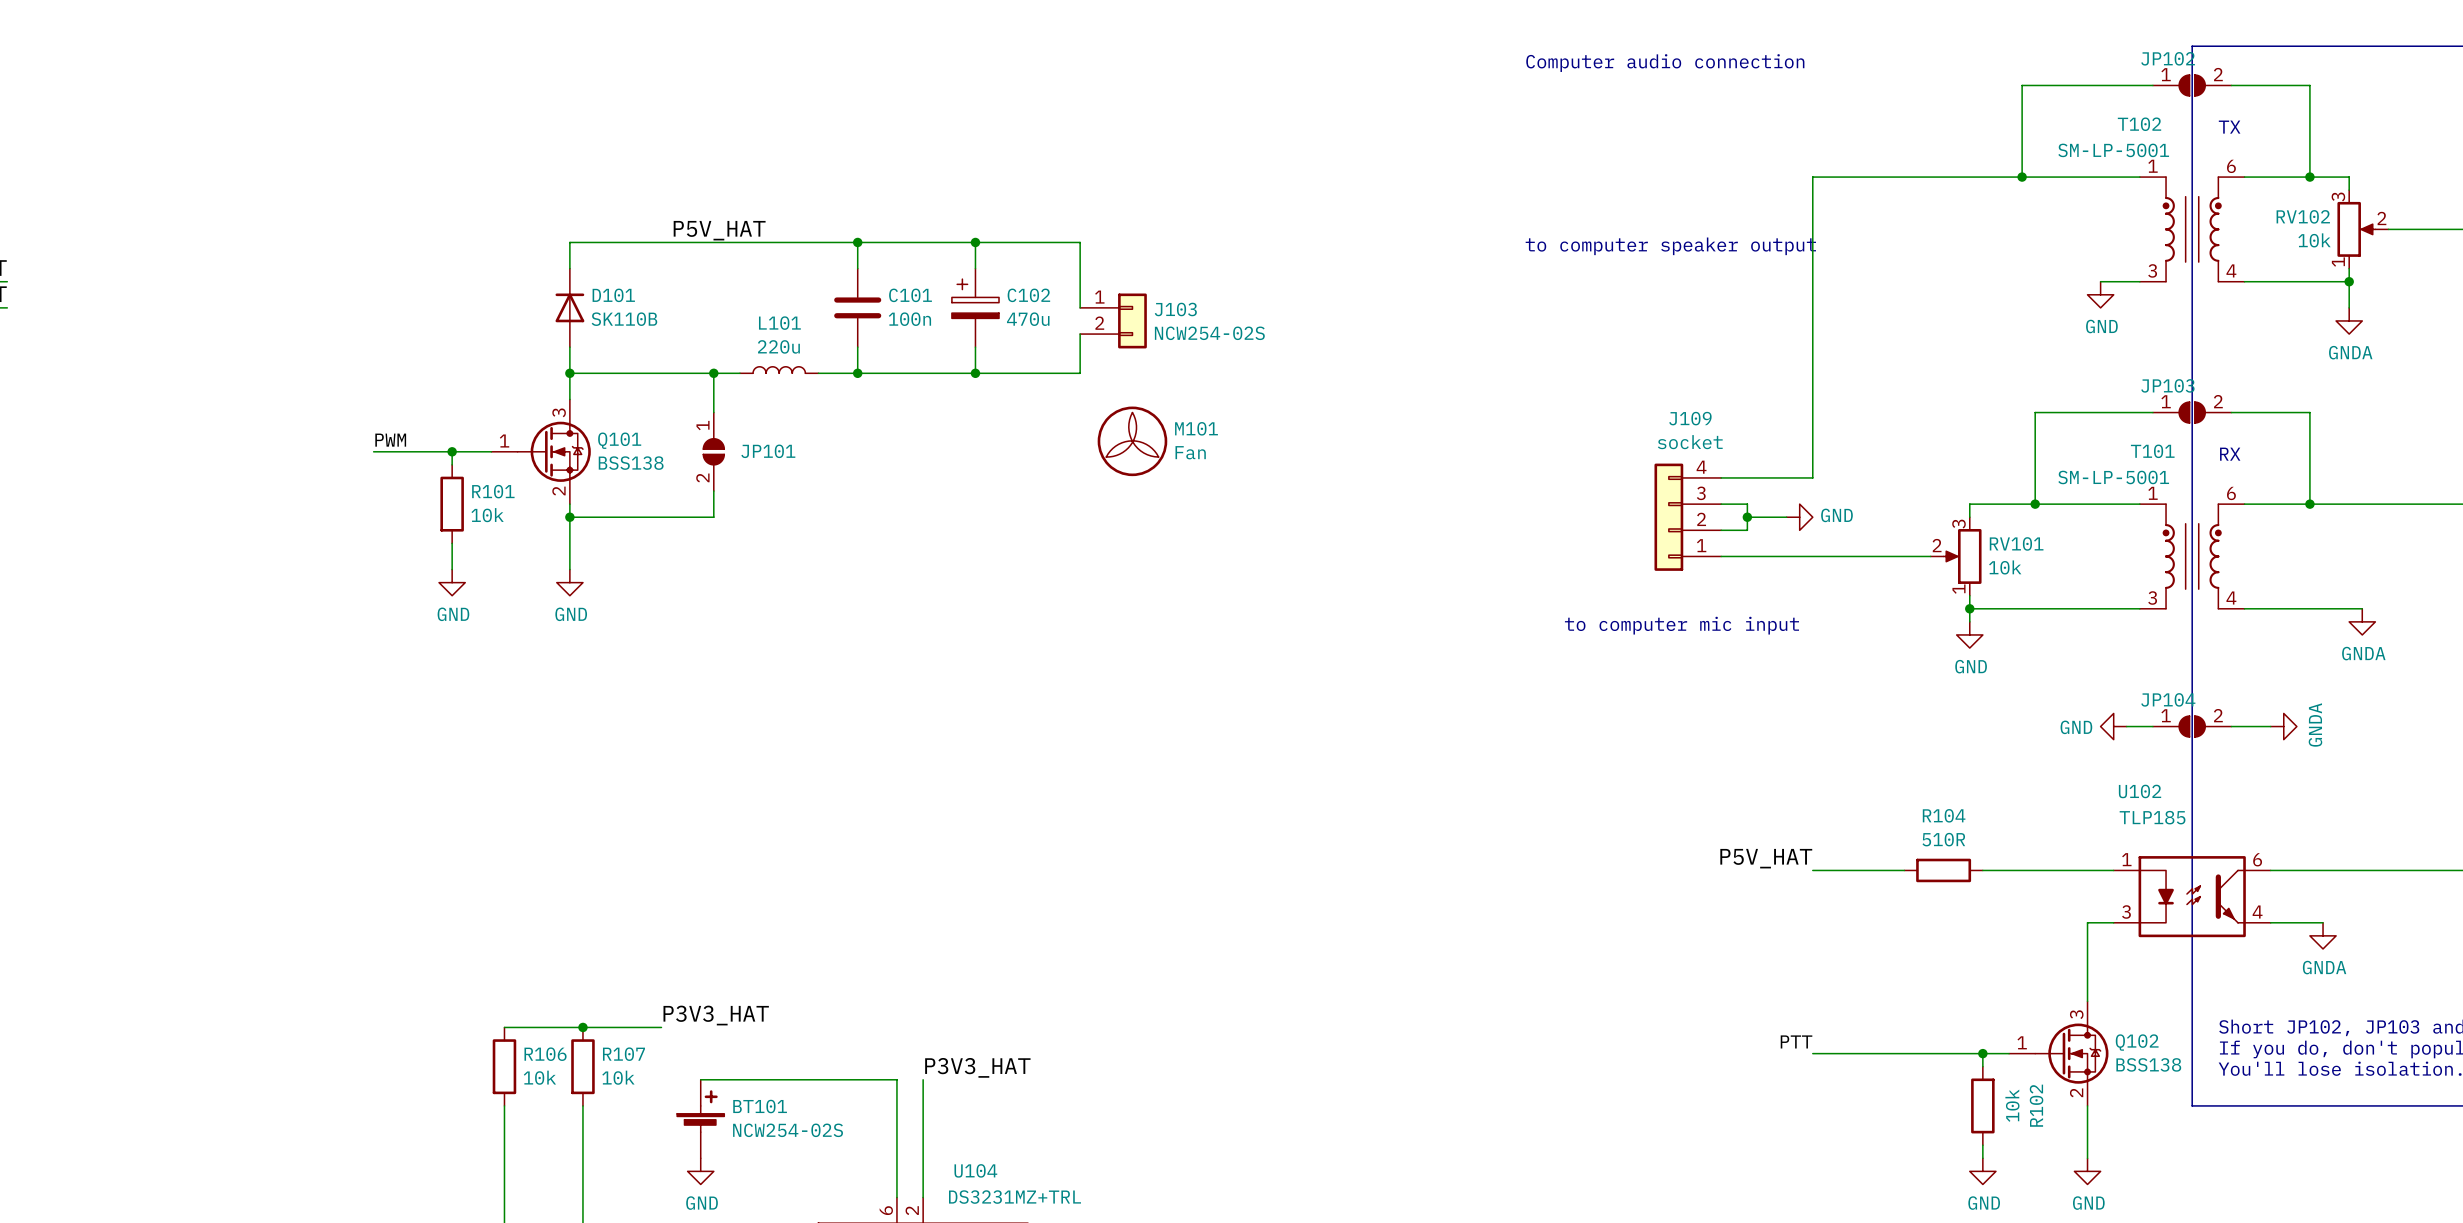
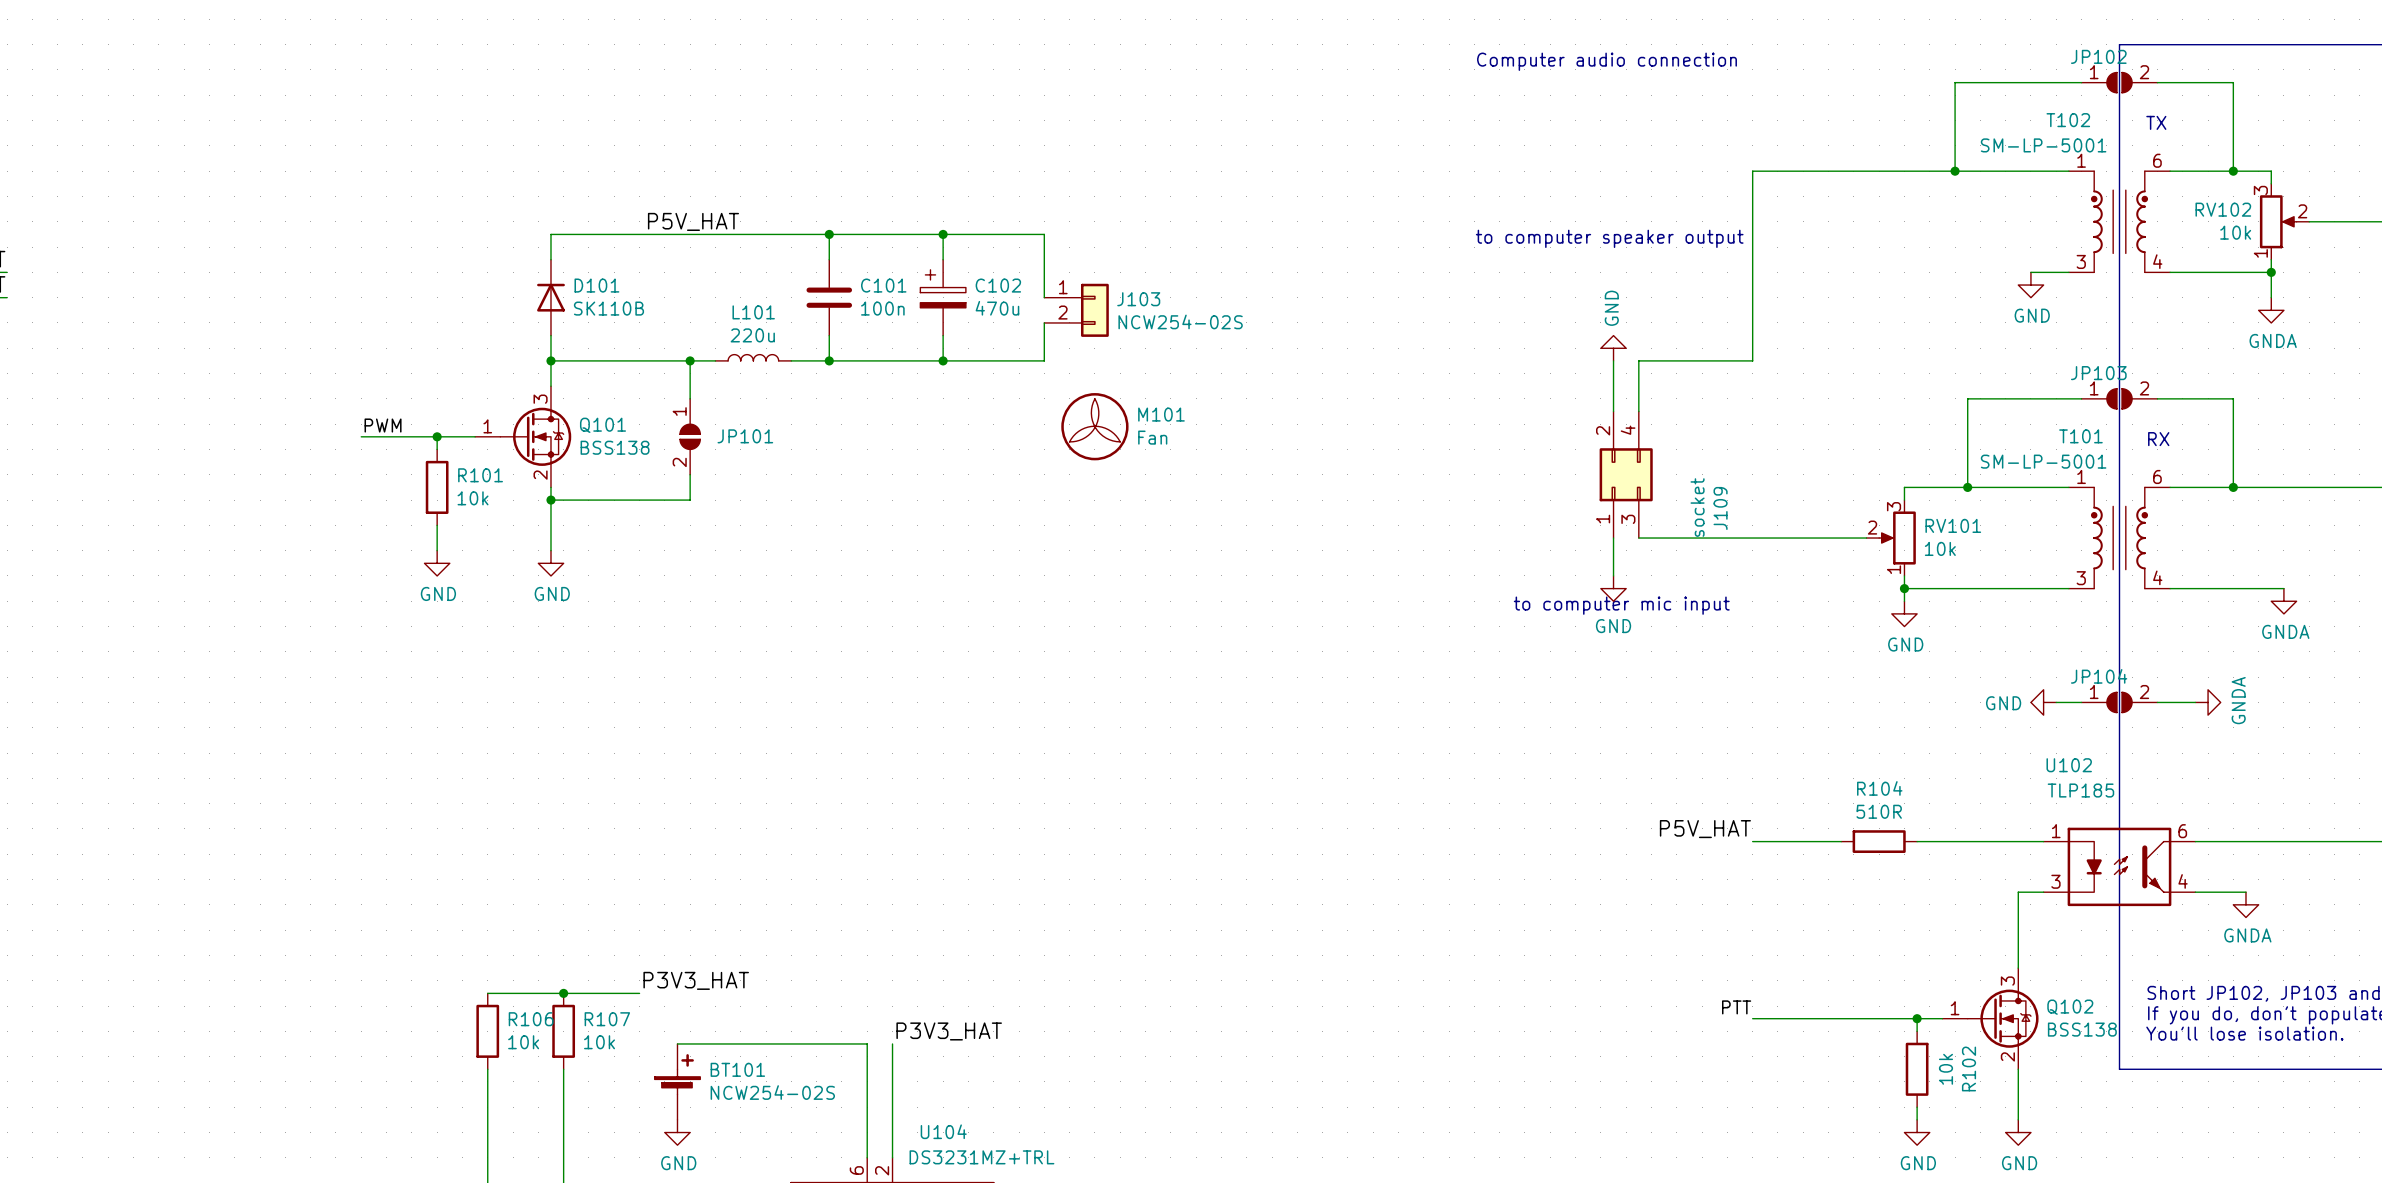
power symbol: none -> GND (1613, 348)
wire: none -> (1613, 360) (1613, 411)
wire: (1812, 373) (1812, 477) (1721, 477) -> (1752, 360) (1638, 360) (1638, 411)
J109 name position: J109 (1690, 418) -> J109 (1720, 508)
J109 value position: socket (1690, 442) -> socket (1697, 507)
J109 symbol: [1654, 463, 1722, 571] -> [1599, 411, 1653, 539]
wire: (1721, 504) (1747, 504) (1747, 530) (1721, 530) -> none
wire: (1747, 517) (1786, 517) -> none
junction: (1747, 517) -> none
power symbol: GND (1799, 517) -> none
wire: none -> (1613, 538) (1613, 575)
power symbol: none -> GND (1613, 588)

